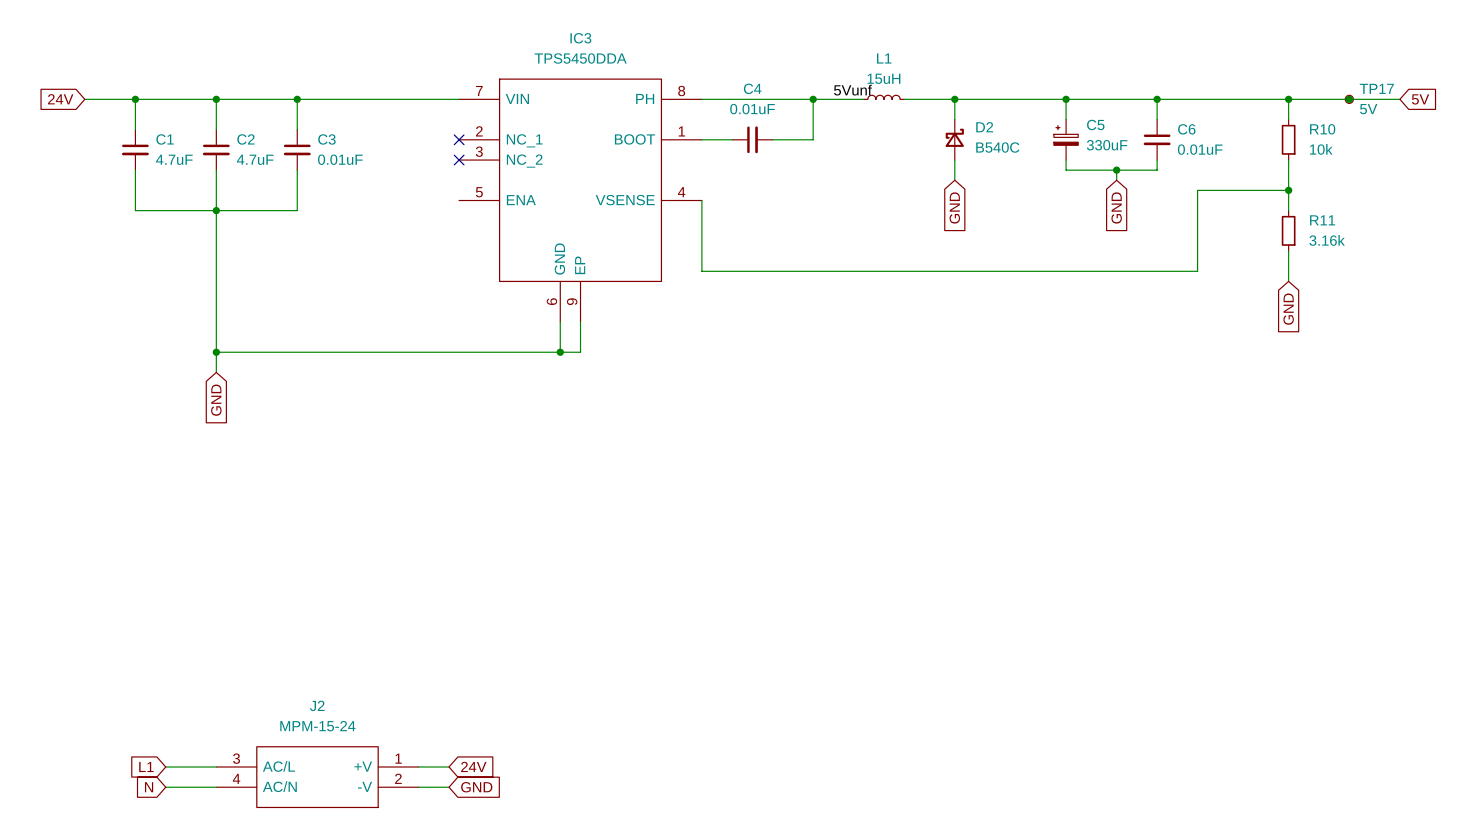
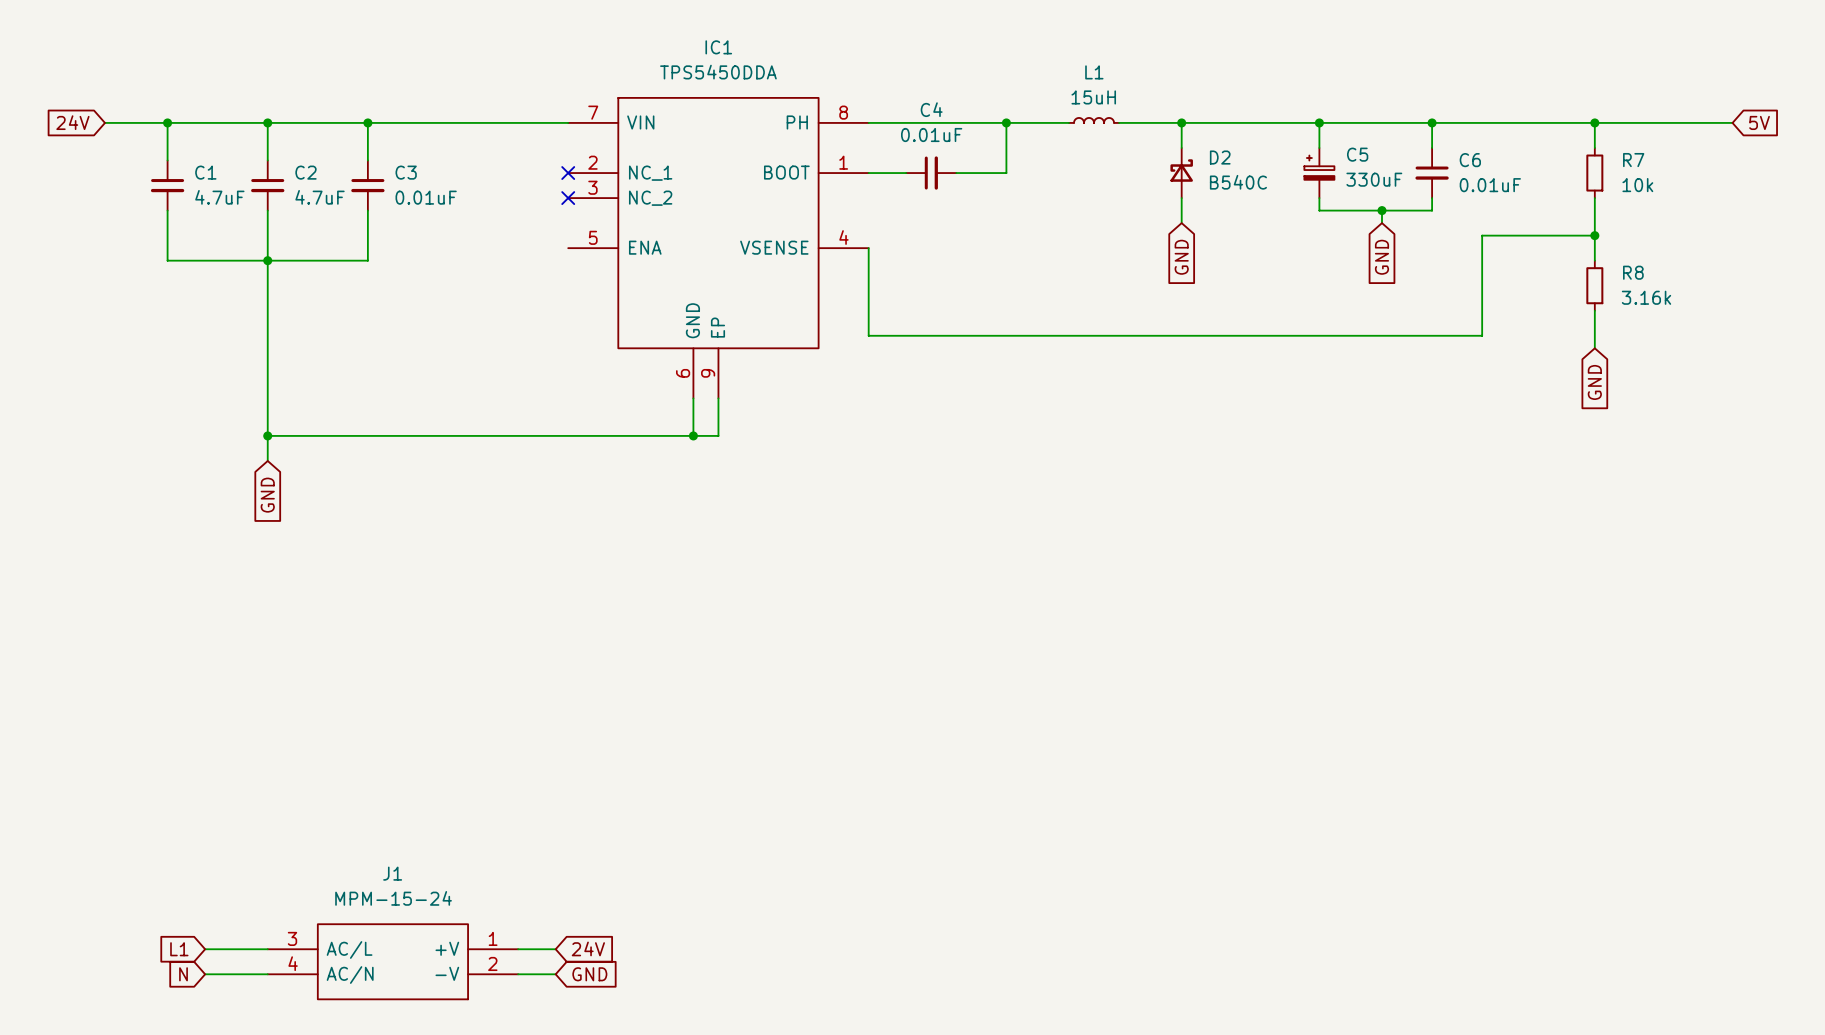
IC3 name: IC3 (580, 38) -> IC1 (718, 47)
label: 5Vunf (852, 90) -> none
junction: (1349, 99) -> none
TP17: 5V (1349, 99) -> none
R10 name: R10 (1322, 129) -> R7 (1633, 160)
R11 name: R11 (1322, 220) -> R8 (1633, 272)
J2 name: J2 (317, 705) -> J1 (392, 873)

